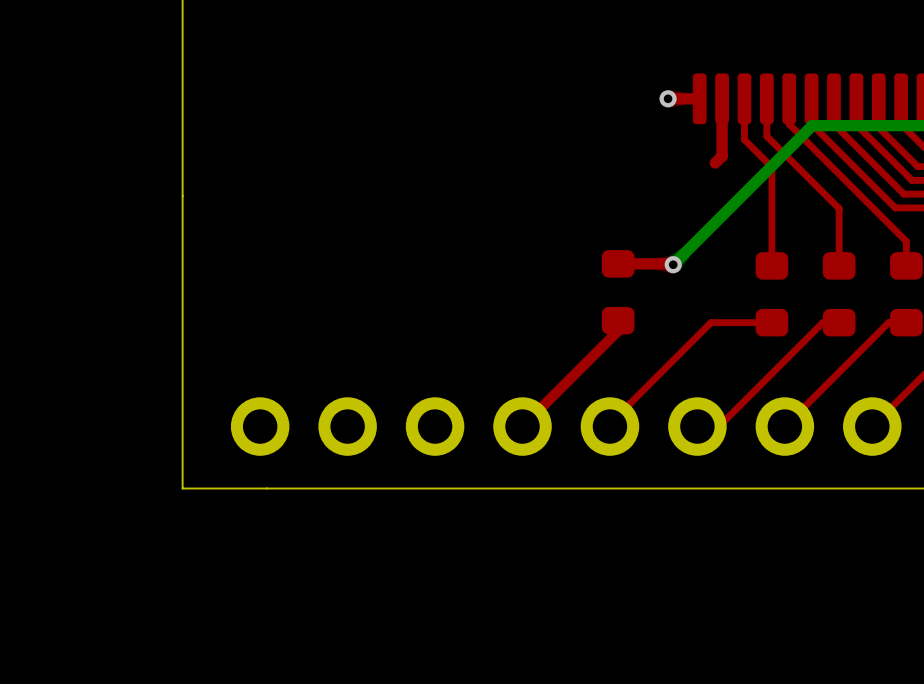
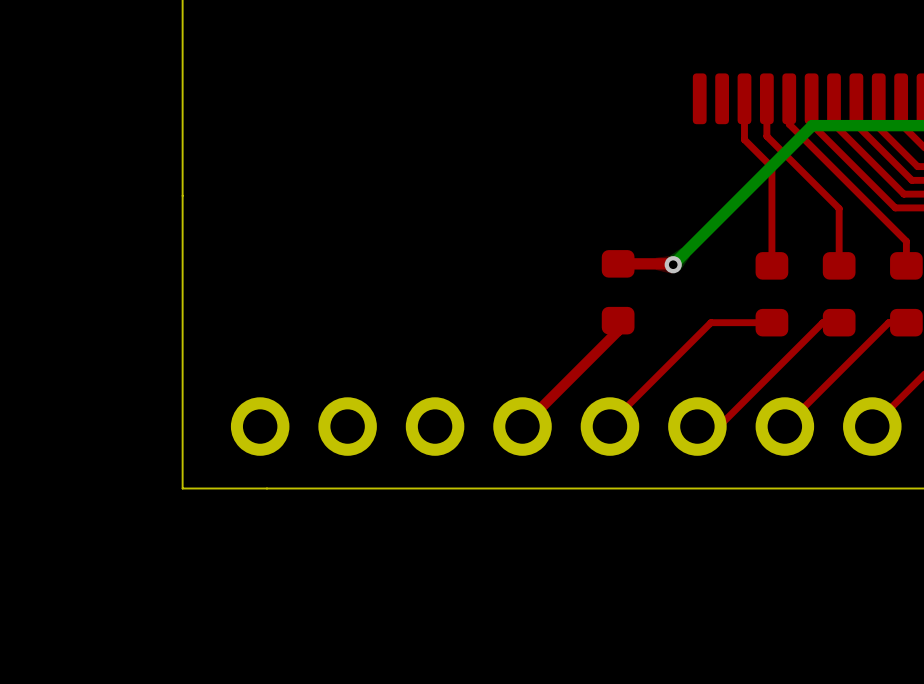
via: (668, 98) -> none
top track: (699, 98) (668, 98) -> none
top track: (722, 98) (722, 156) (715, 163) -> none

